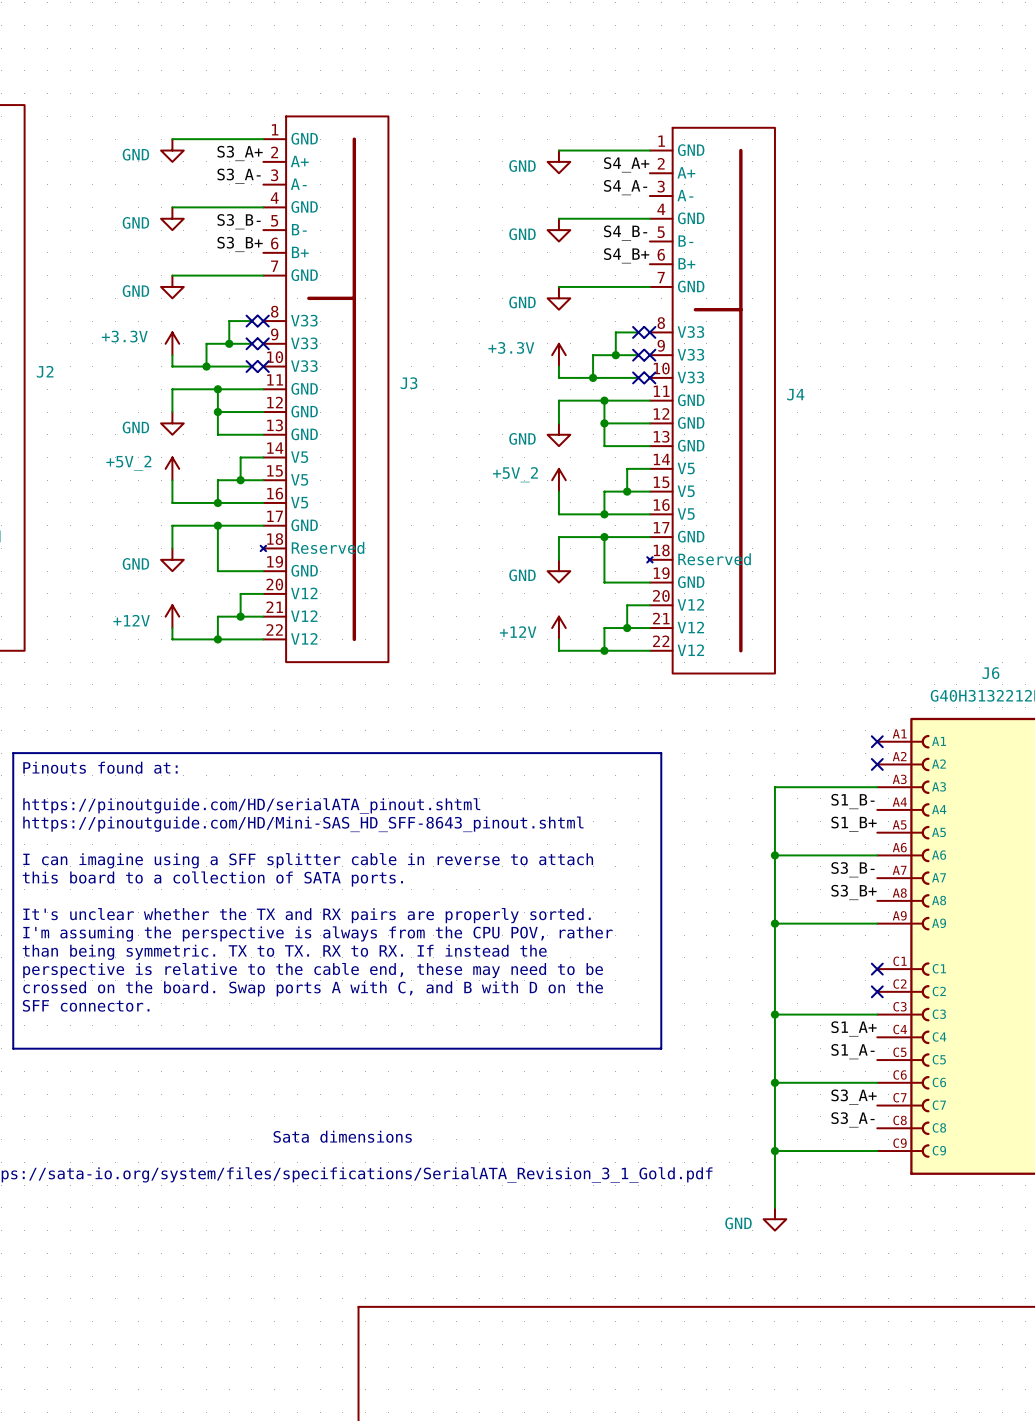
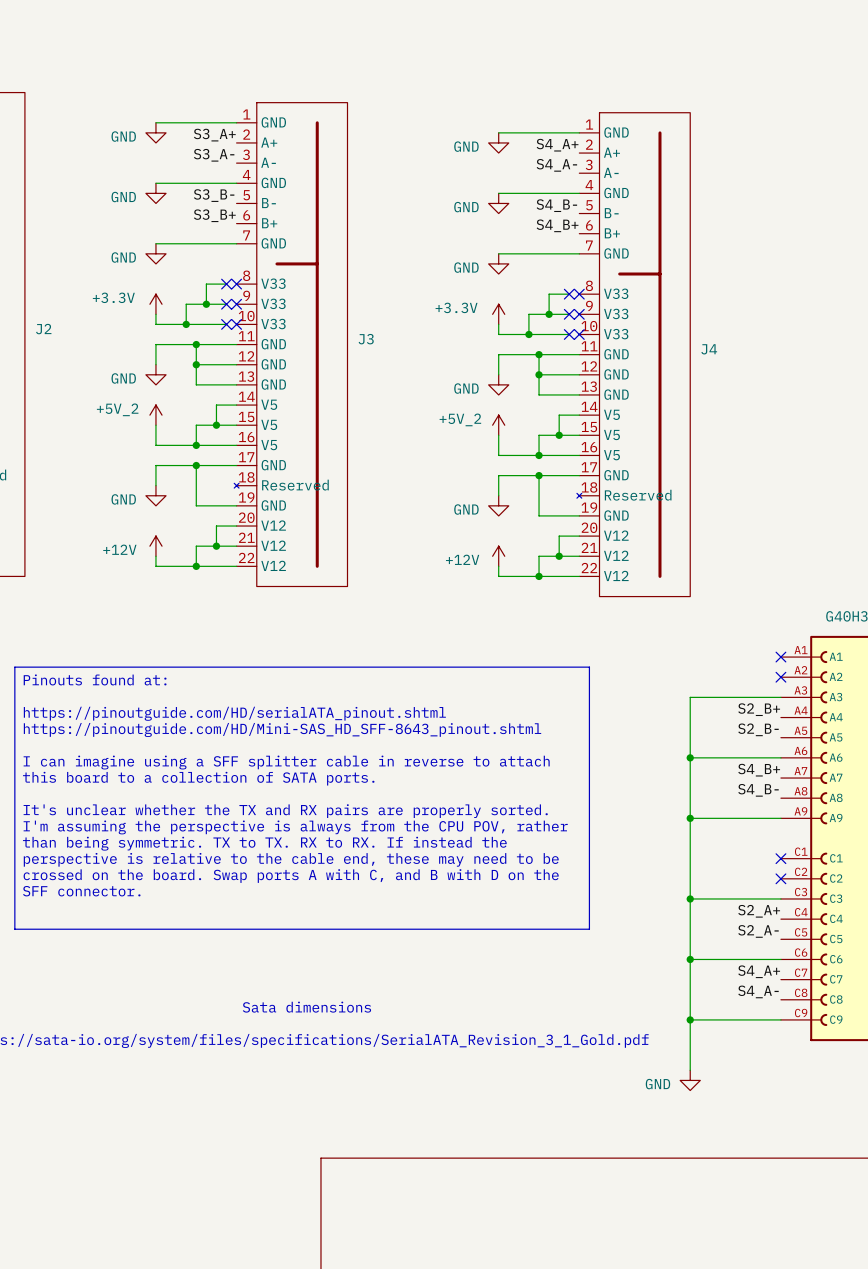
label: S1_B- (852, 801) -> S2_B+ (759, 709)
label: S1_B+ (854, 824) -> S2_B- (758, 729)
label: S3_B- (852, 869) -> S4_B+ (759, 770)
label: S3_B+ (854, 892) -> S4_B- (758, 790)
label: S1_A+ (854, 1028) -> S2_A+ (759, 911)
label: S1_A- (852, 1051) -> S2_A- (758, 931)
label: S3_A+ (854, 1097) -> S4_A+ (759, 971)
label: S3_A- (852, 1119) -> S4_A- (758, 991)

